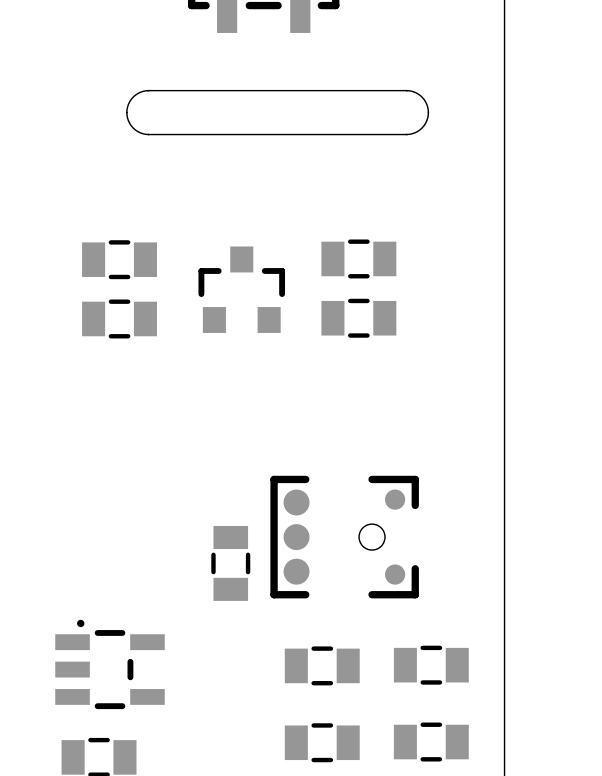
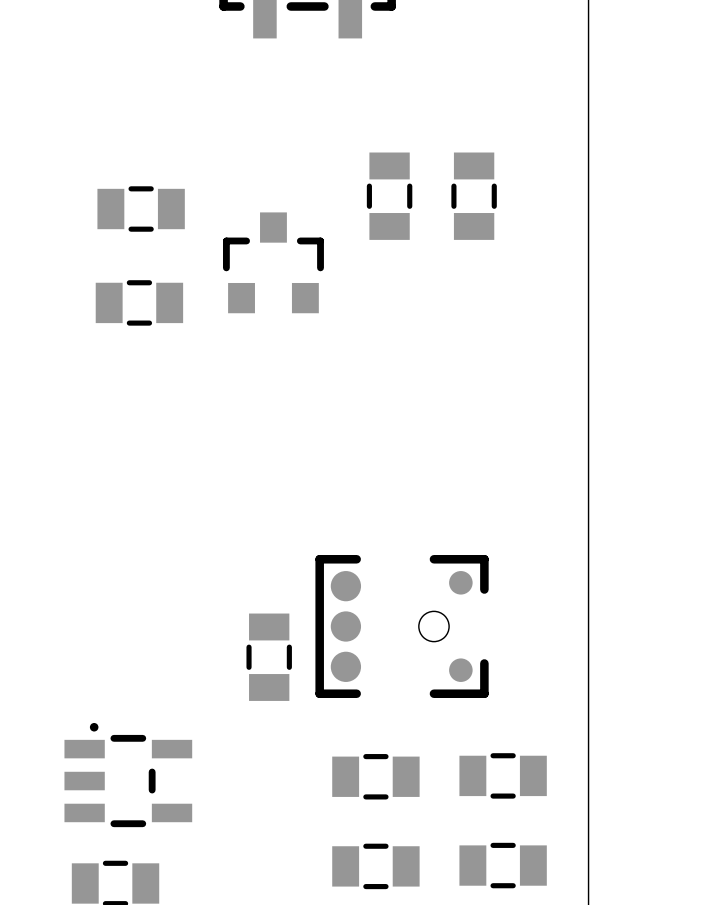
board edge: (148, 90) (407, 90) -> none
board edge: (148, 90) (140, 92) (133, 97) (128, 104) (126, 112) (128, 120) (133, 128) (140, 132) (148, 134) -> none
board edge: (406, 90) (414, 92) (421, 97) (426, 104) (428, 112) (426, 120) (421, 128) (414, 132) (406, 134) -> none
board edge: (148, 134) (407, 134) -> none
part: none -> (389, 196)
part: none -> (474, 196)
part: none -> (141, 209)
part: (358, 258) -> none
part position: (241, 289) -> (273, 262)
part: (119, 318) -> none
part: (358, 318) -> none

